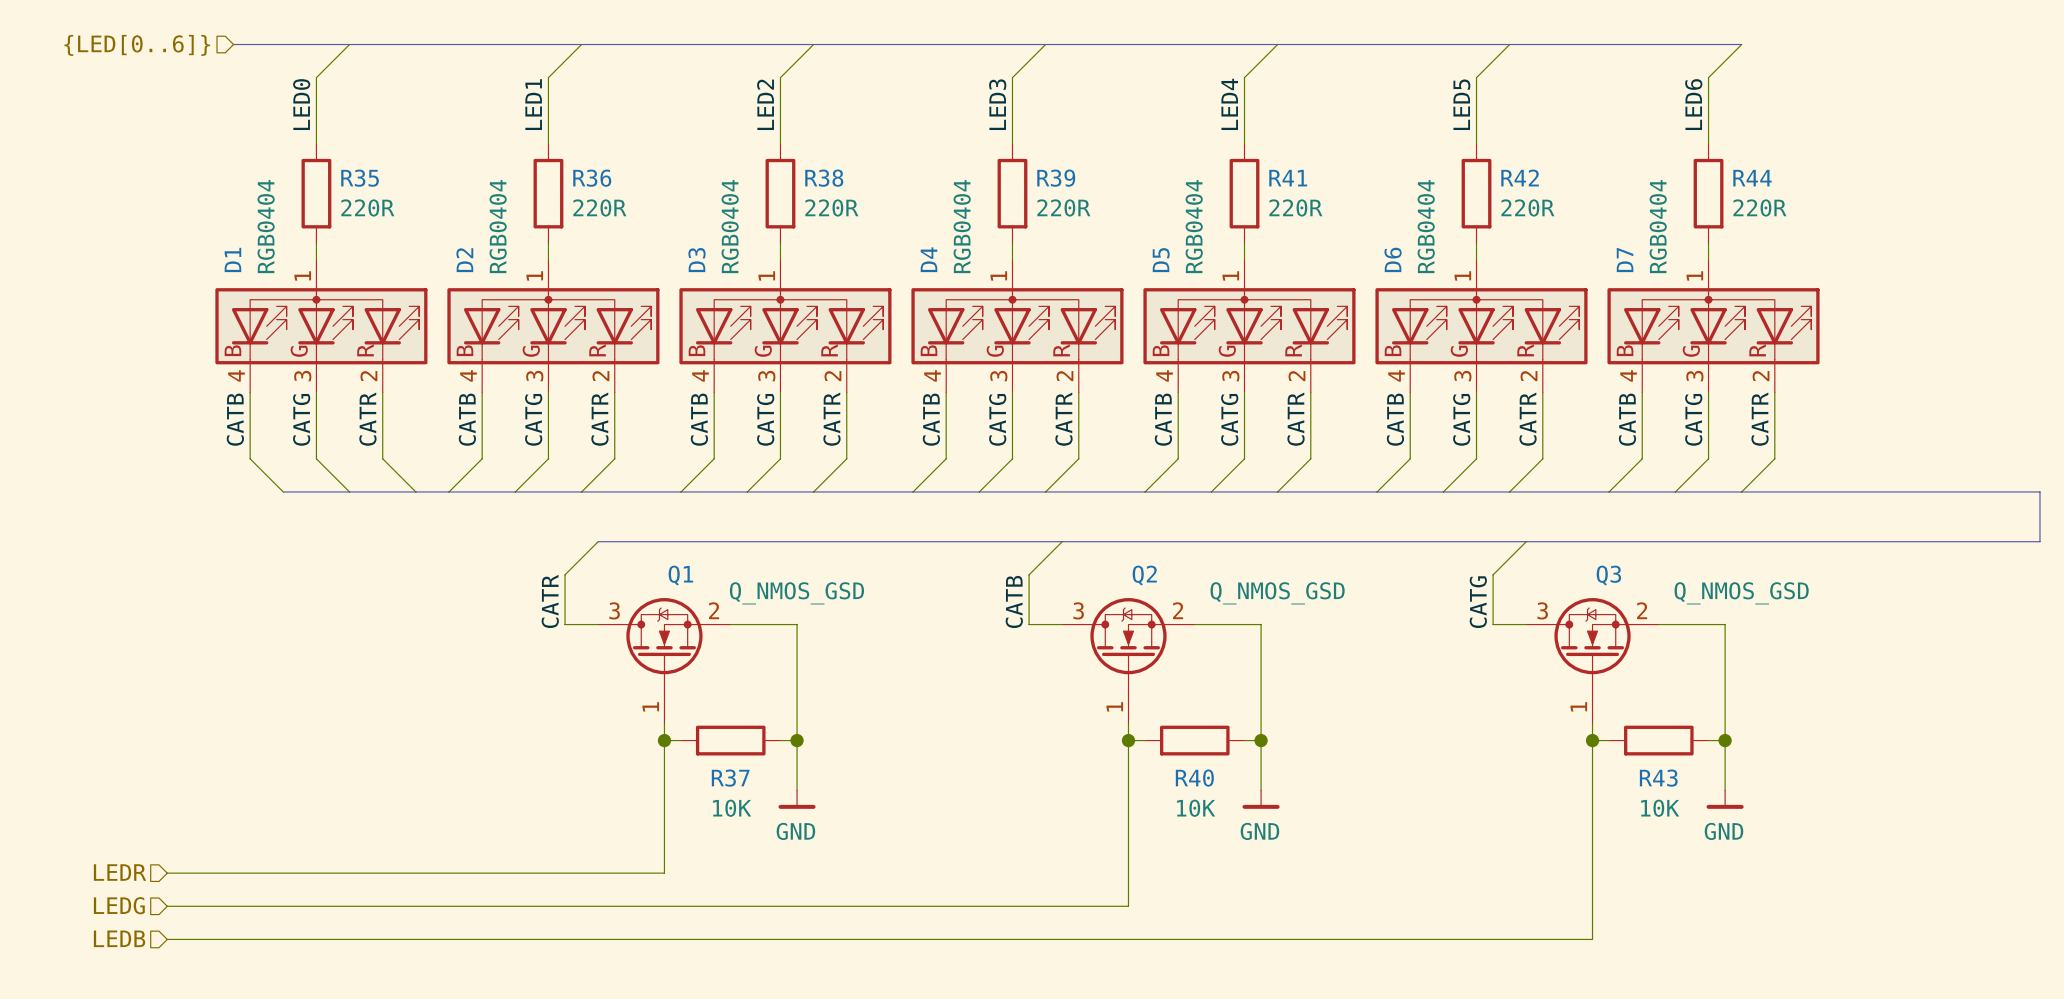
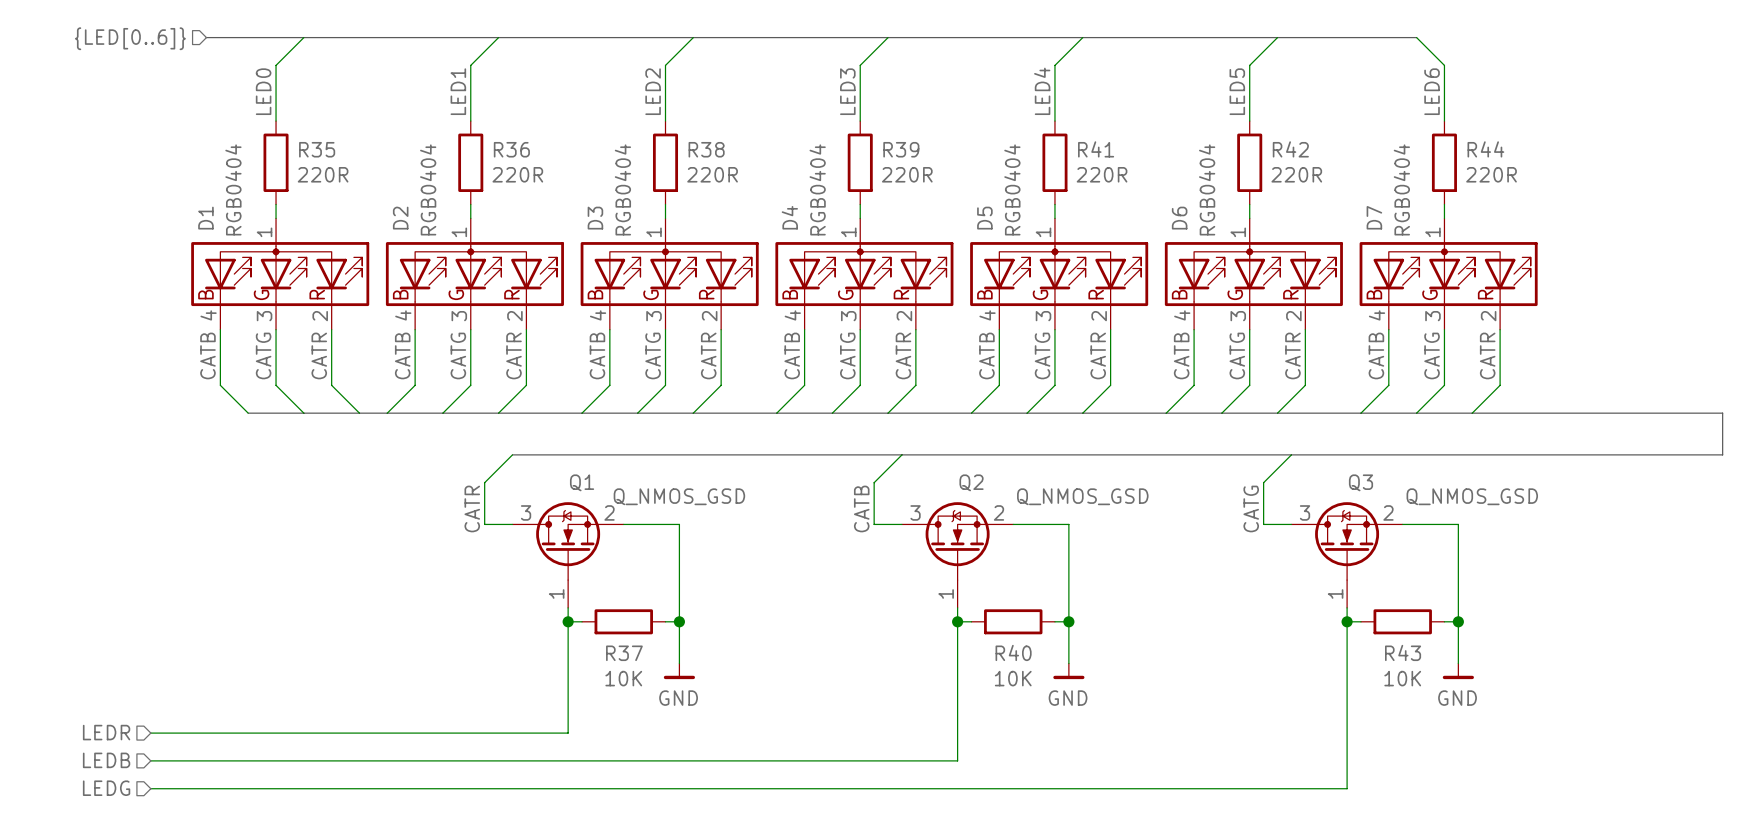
bus: (1675, 44) (1741, 44) -> none
wire: (1741, 44) (1708, 77) -> (1416, 37) (1444, 65)
hierarchical label: LEDG (119, 905) -> LEDB (106, 760)
hierarchical label: LEDB (119, 938) -> LEDG (106, 788)

